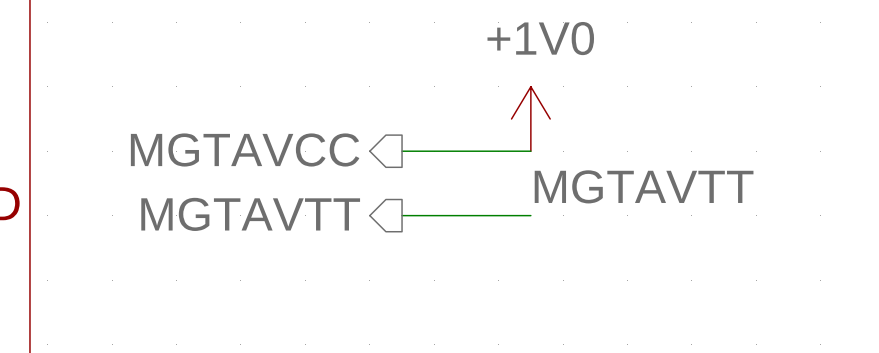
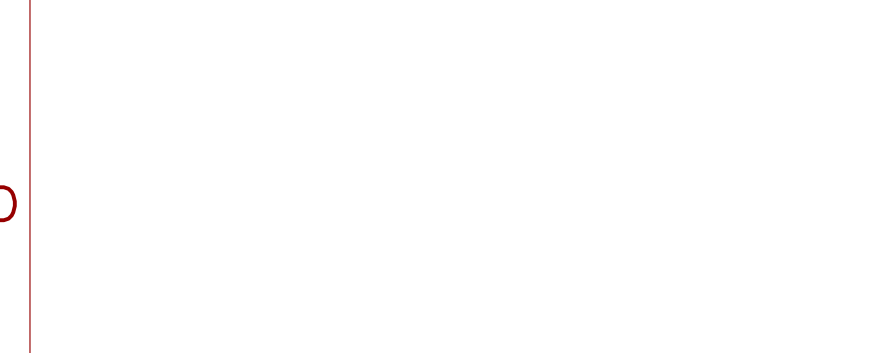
power symbol: +1V0 (530, 118) -> none
hierarchical label: MGTAVCC (245, 149) -> none
wire: (402, 151) (530, 151) -> none
label: MGTAVTT (644, 186) -> none
hierarchical label: MGTAVTT (250, 214) -> none
wire: (402, 215) (530, 215) -> none

